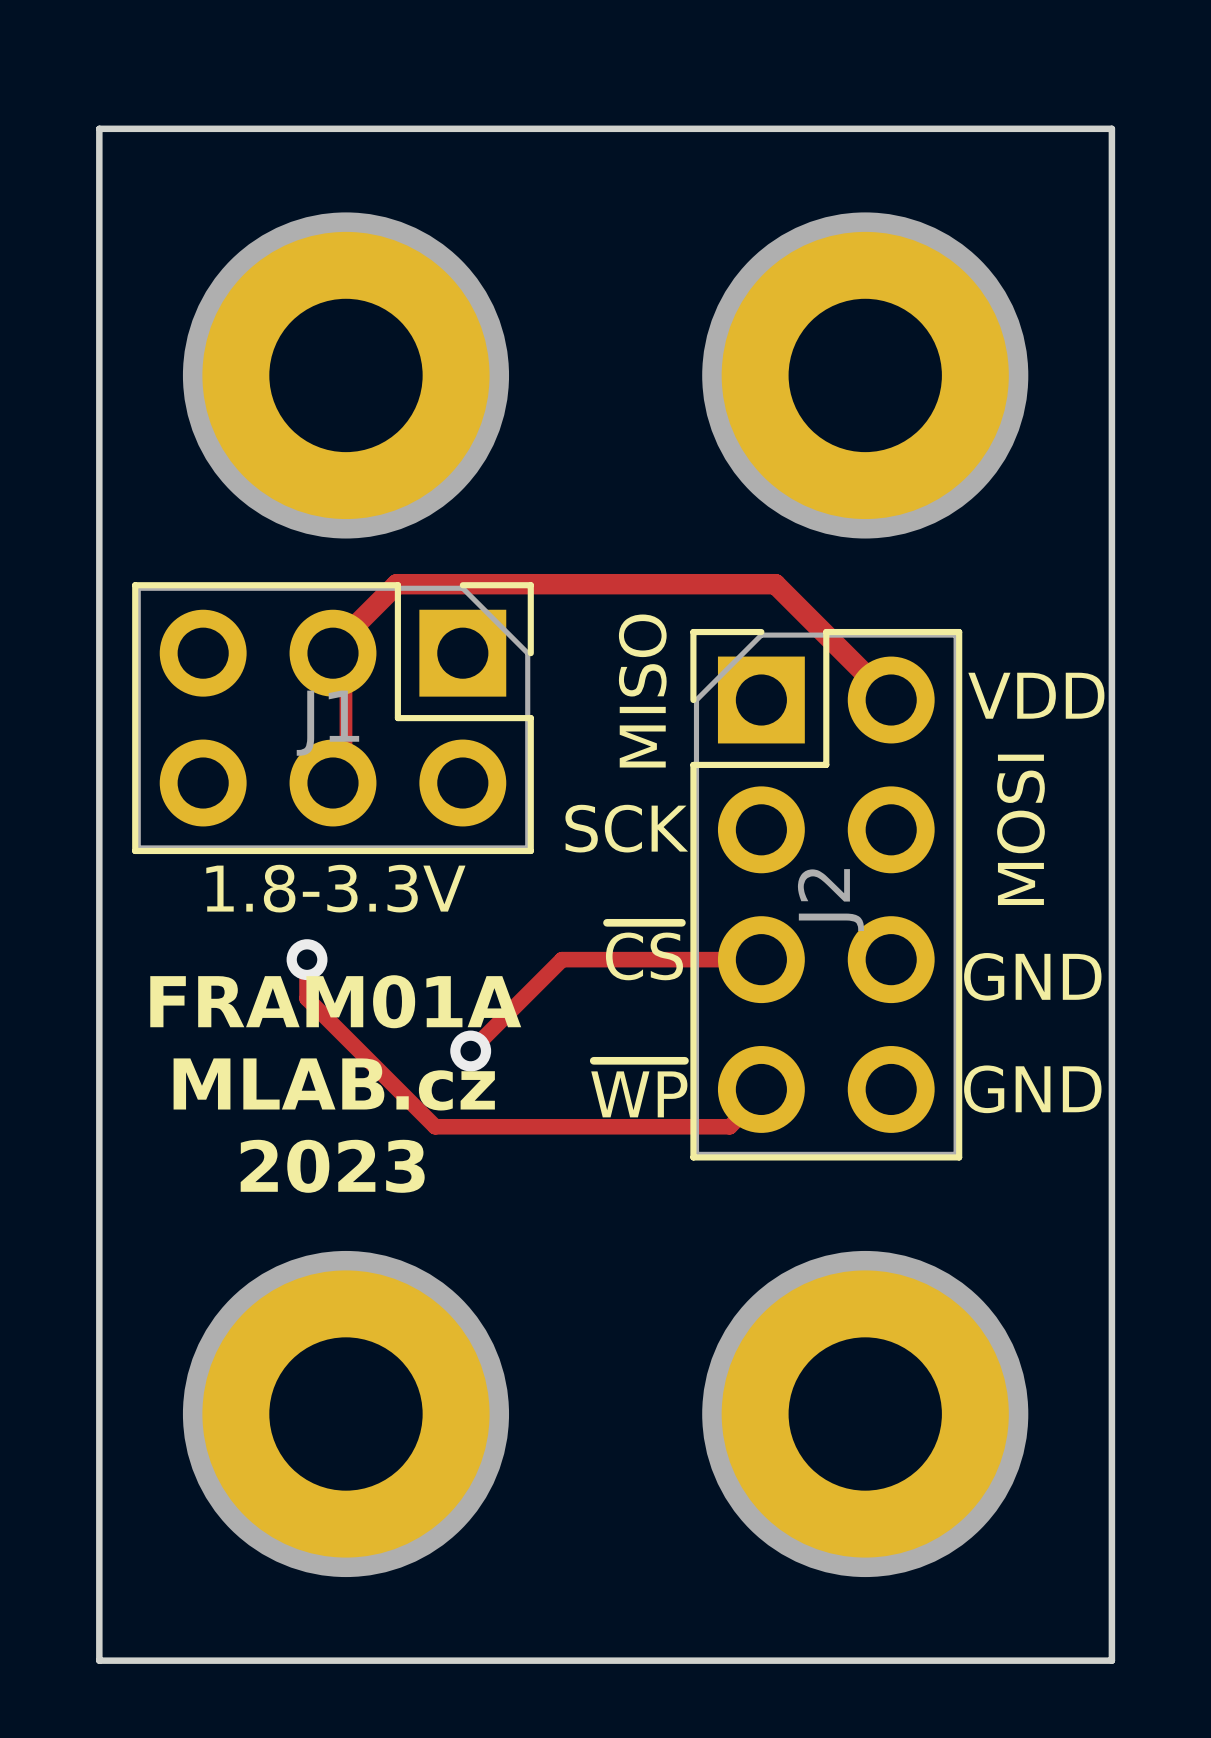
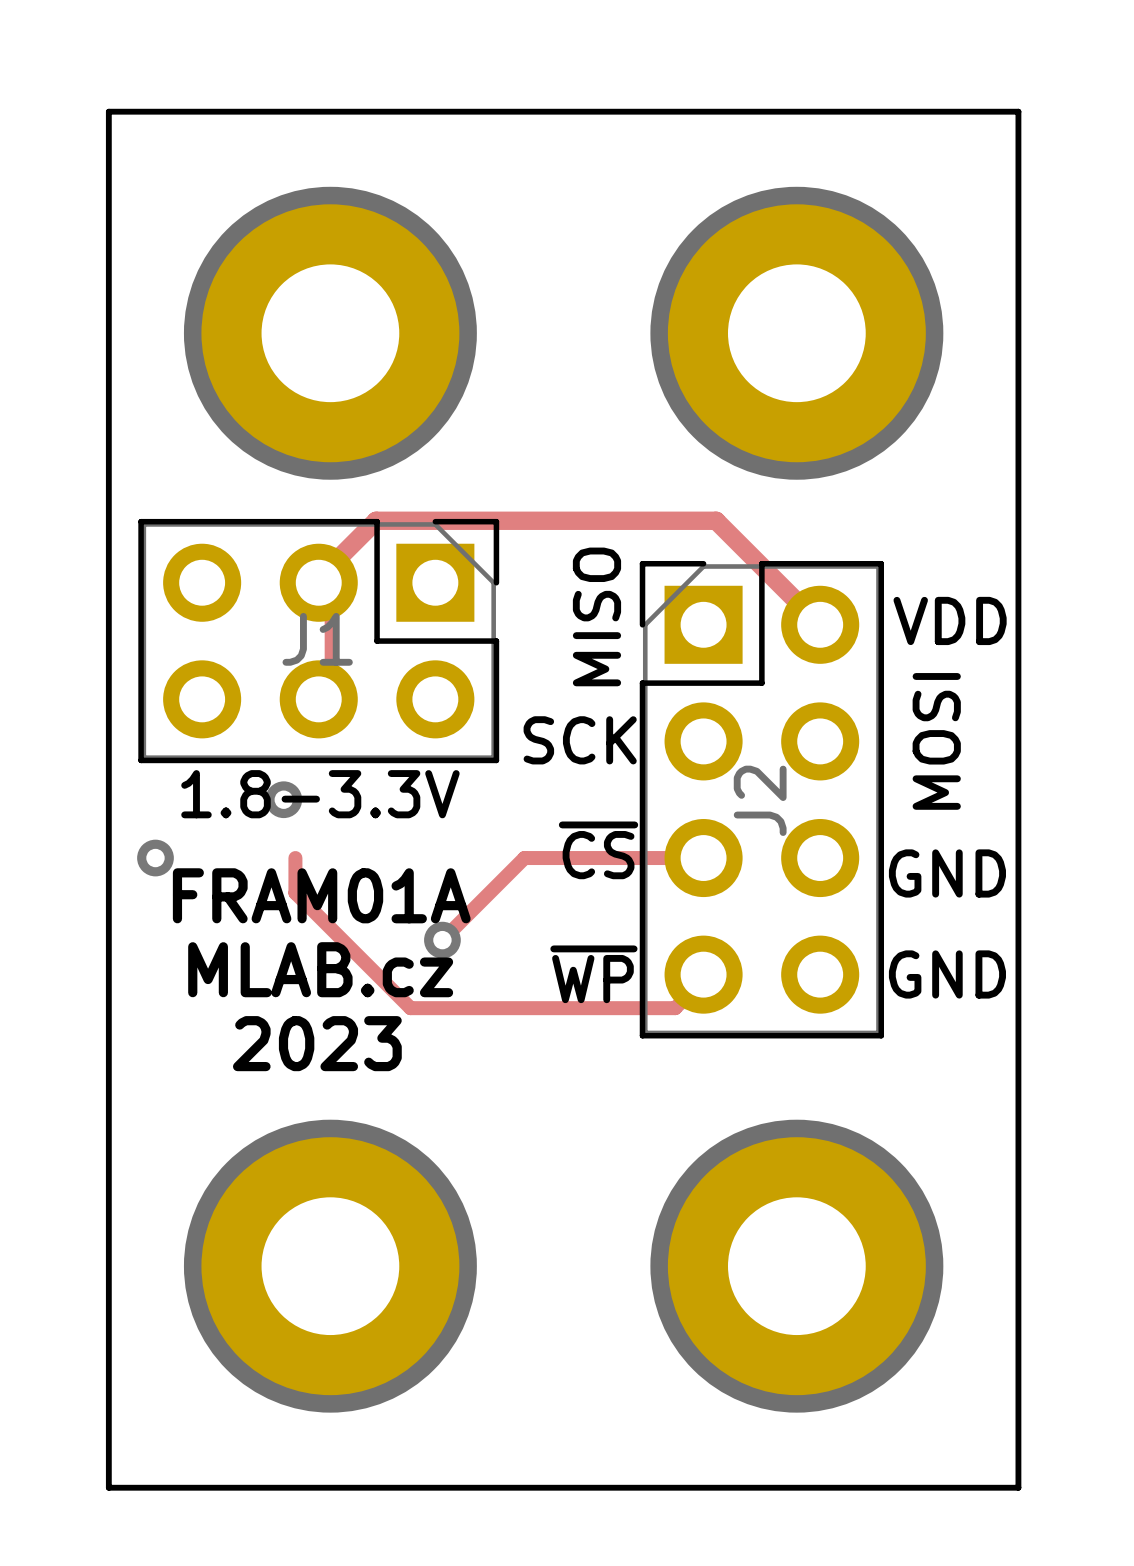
via: none -> (155, 858)
via position: (307, 959) -> (283, 799)

